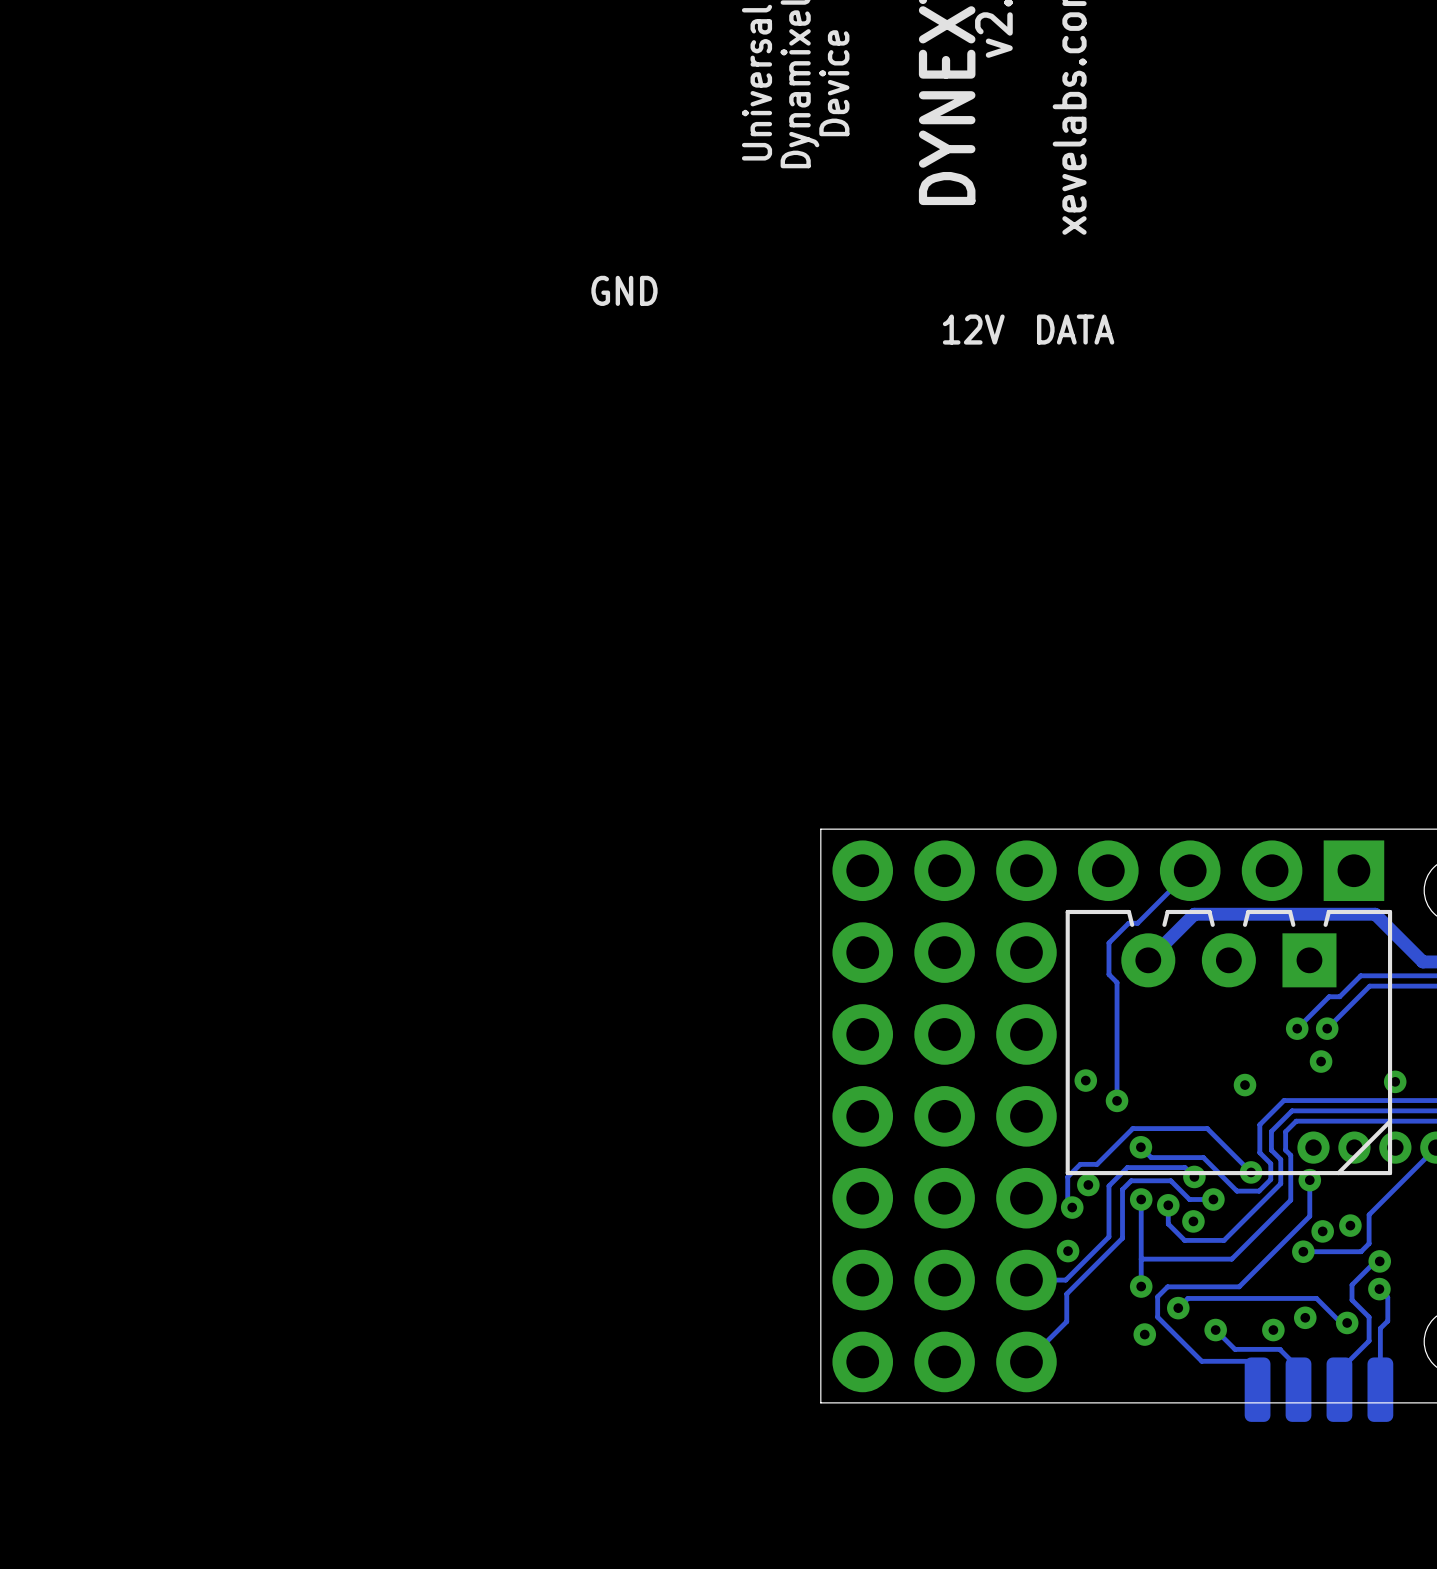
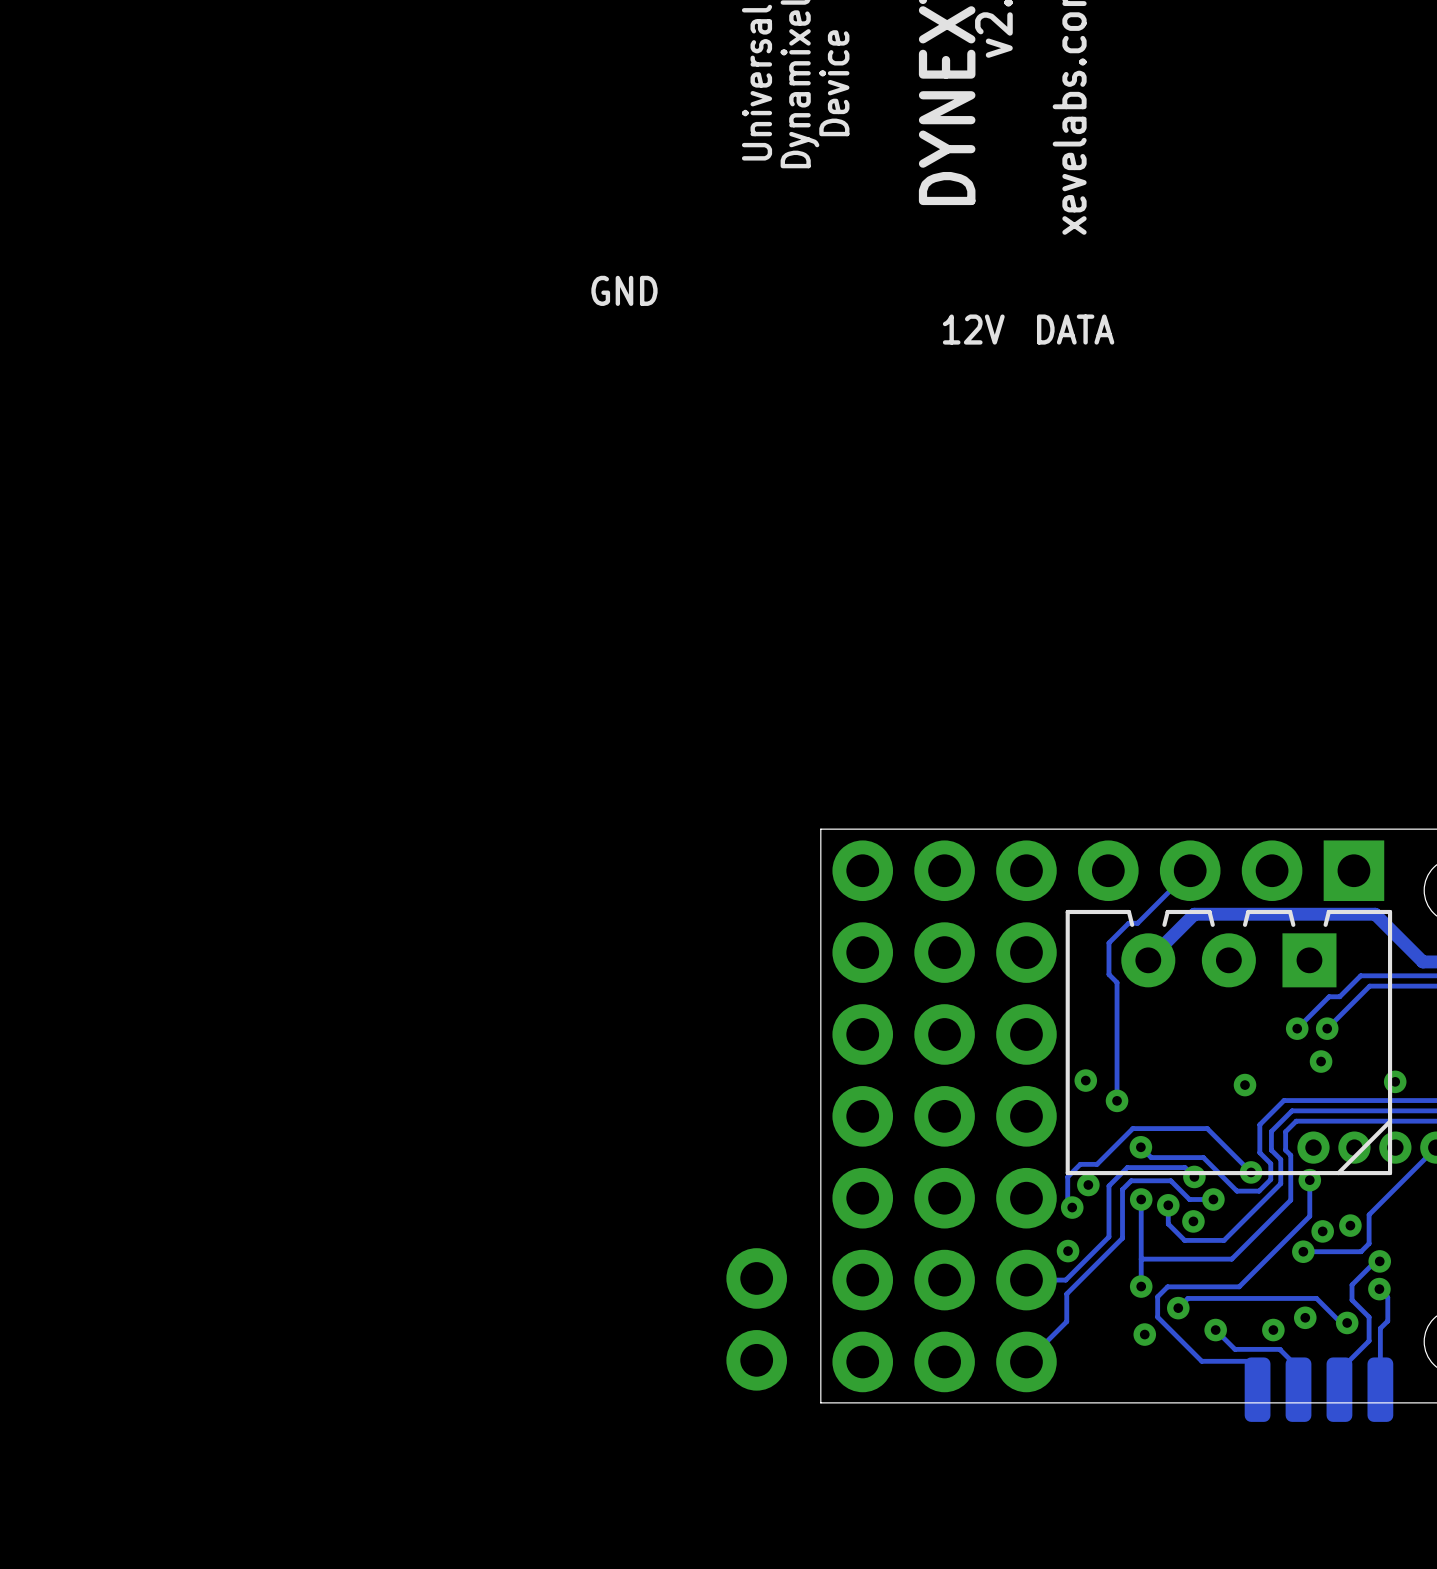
part: none -> (756, 1319)

